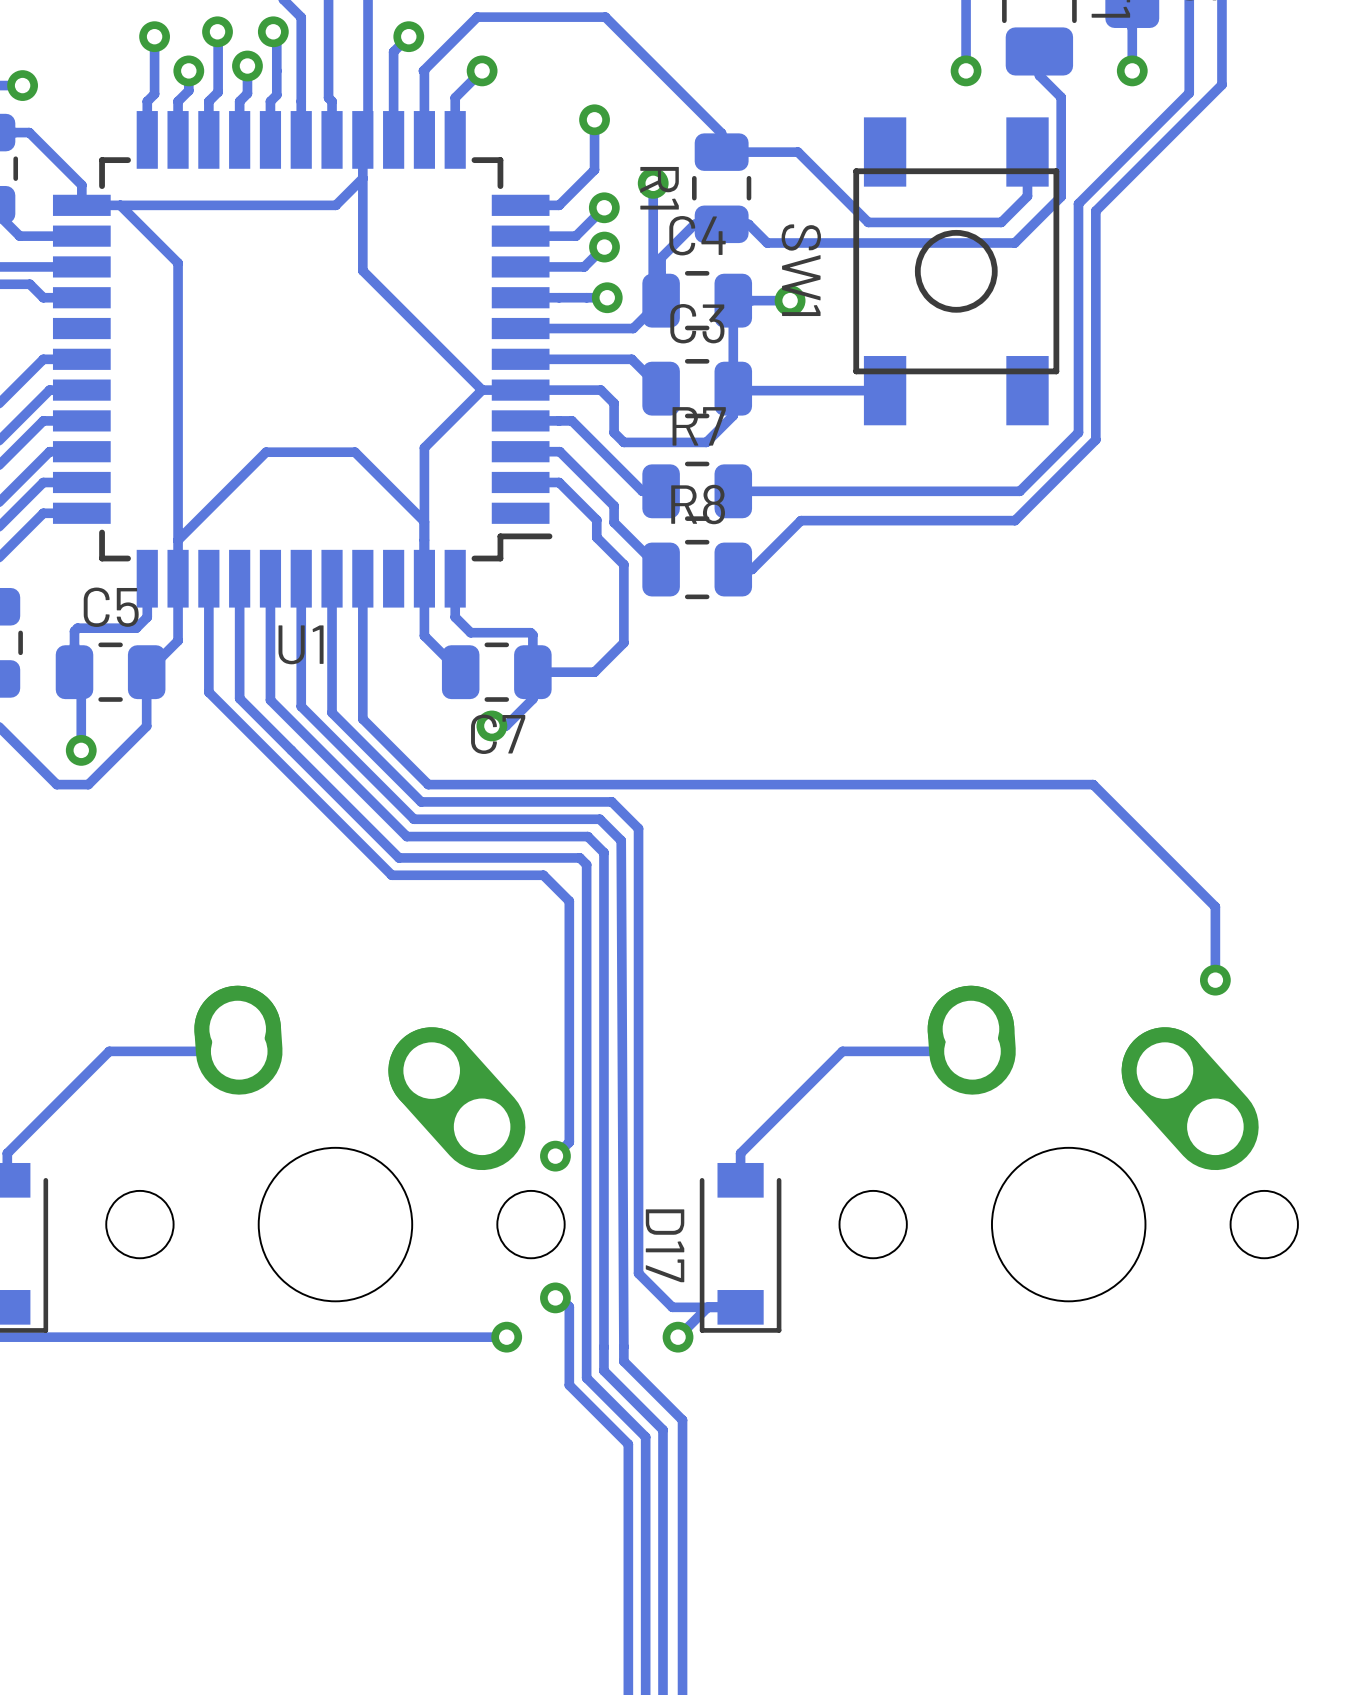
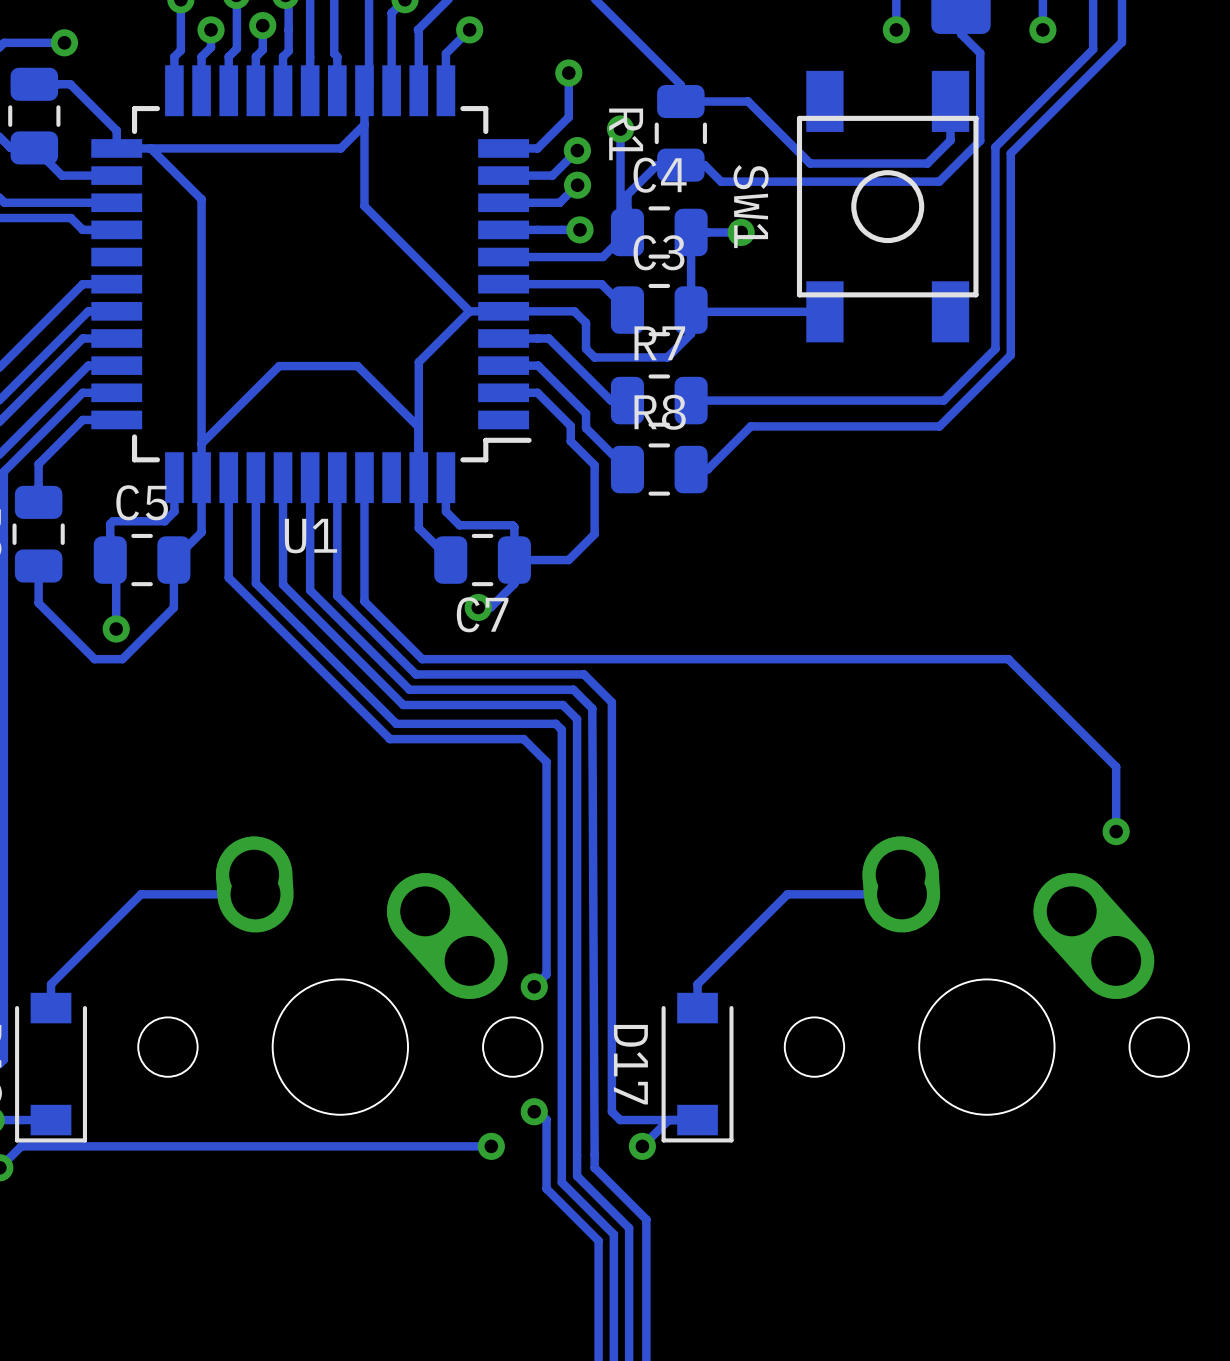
track: (638, 828) (638, 1273) (672, 1307) -> (607, 697) (611, 702) (611, 1111) (620, 1120) (637, 1120)

